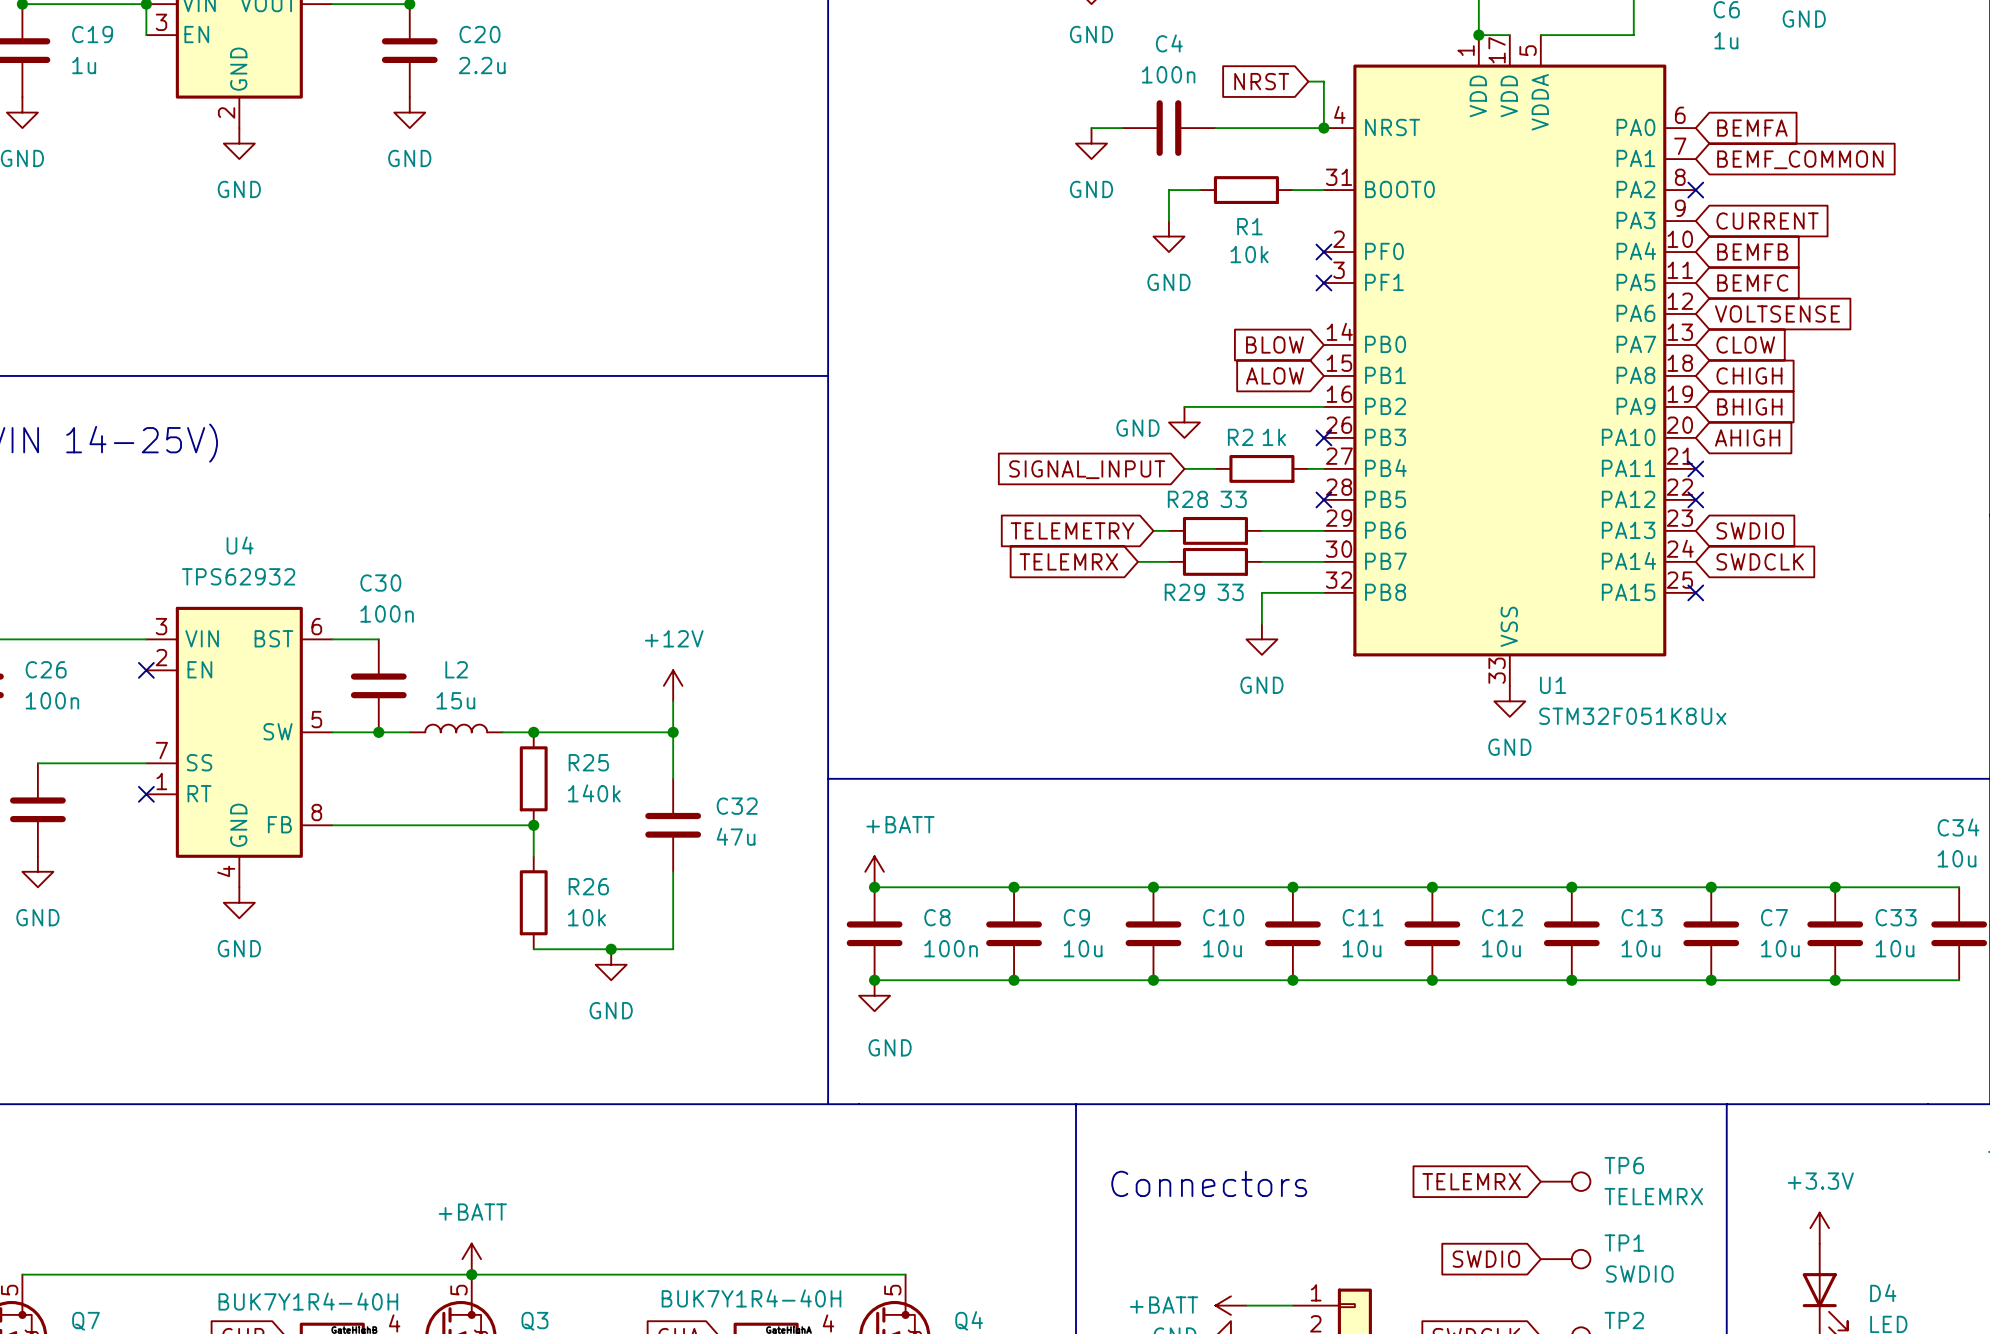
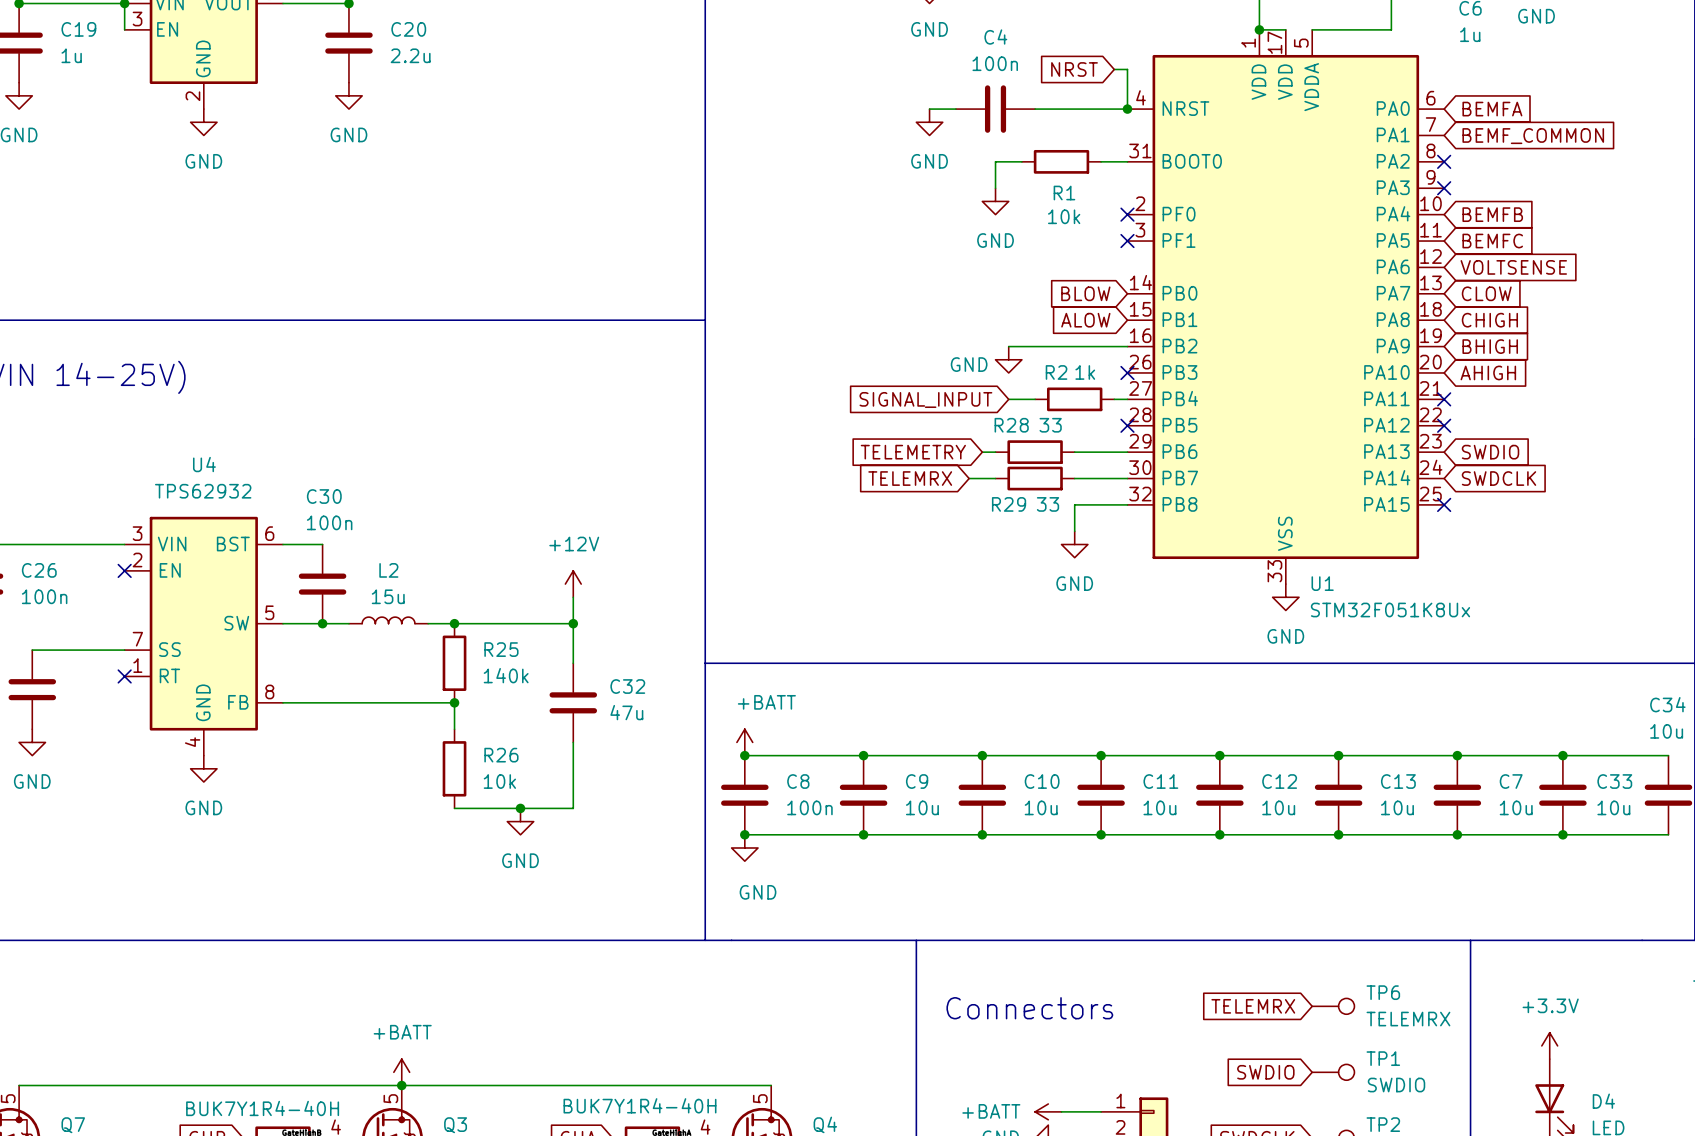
no-connect mark: none -> (1444, 188)
global label: CURRENT (1767, 221) -> none

